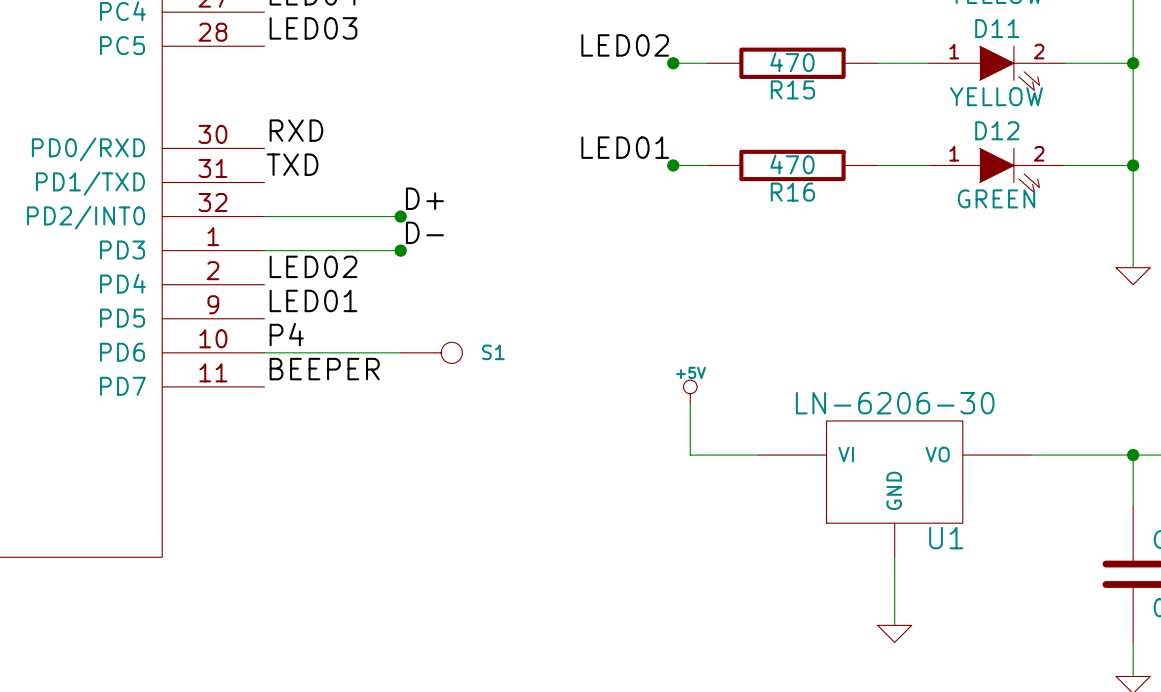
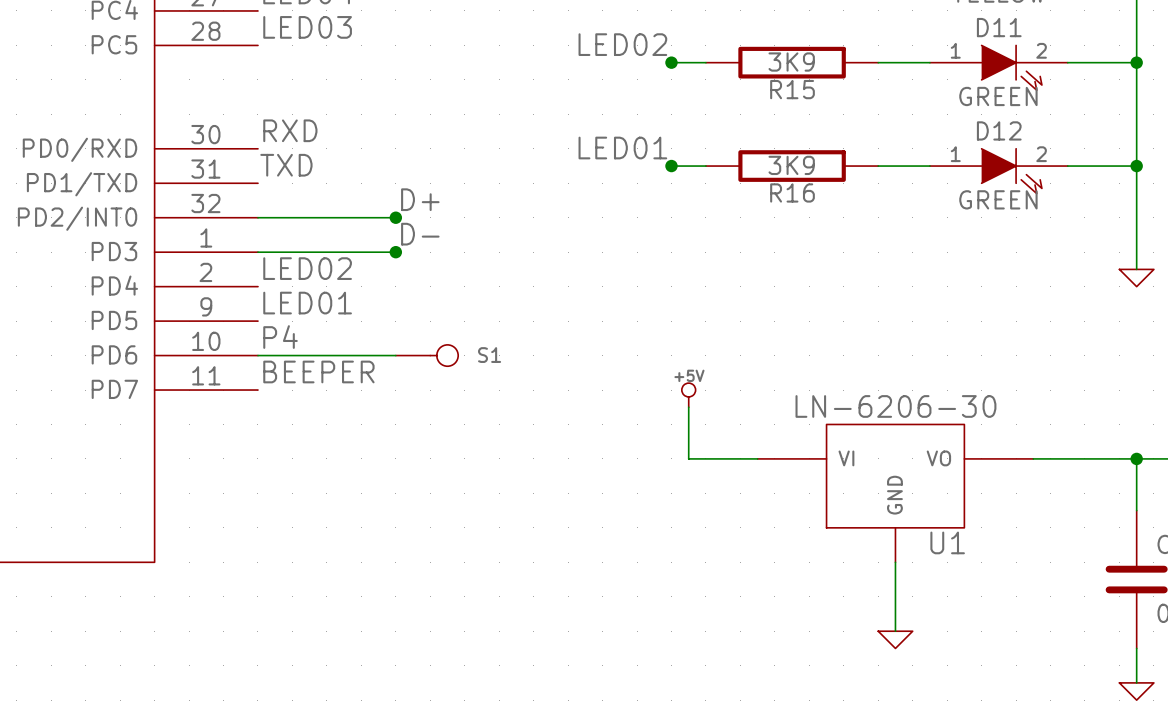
R15 value: 470 (792, 62) -> 3K9 (791, 62)
D11 value: YELLOW (996, 96) -> GREEN (998, 96)
R16 value: 470 (792, 164) -> 3K9 (791, 165)

